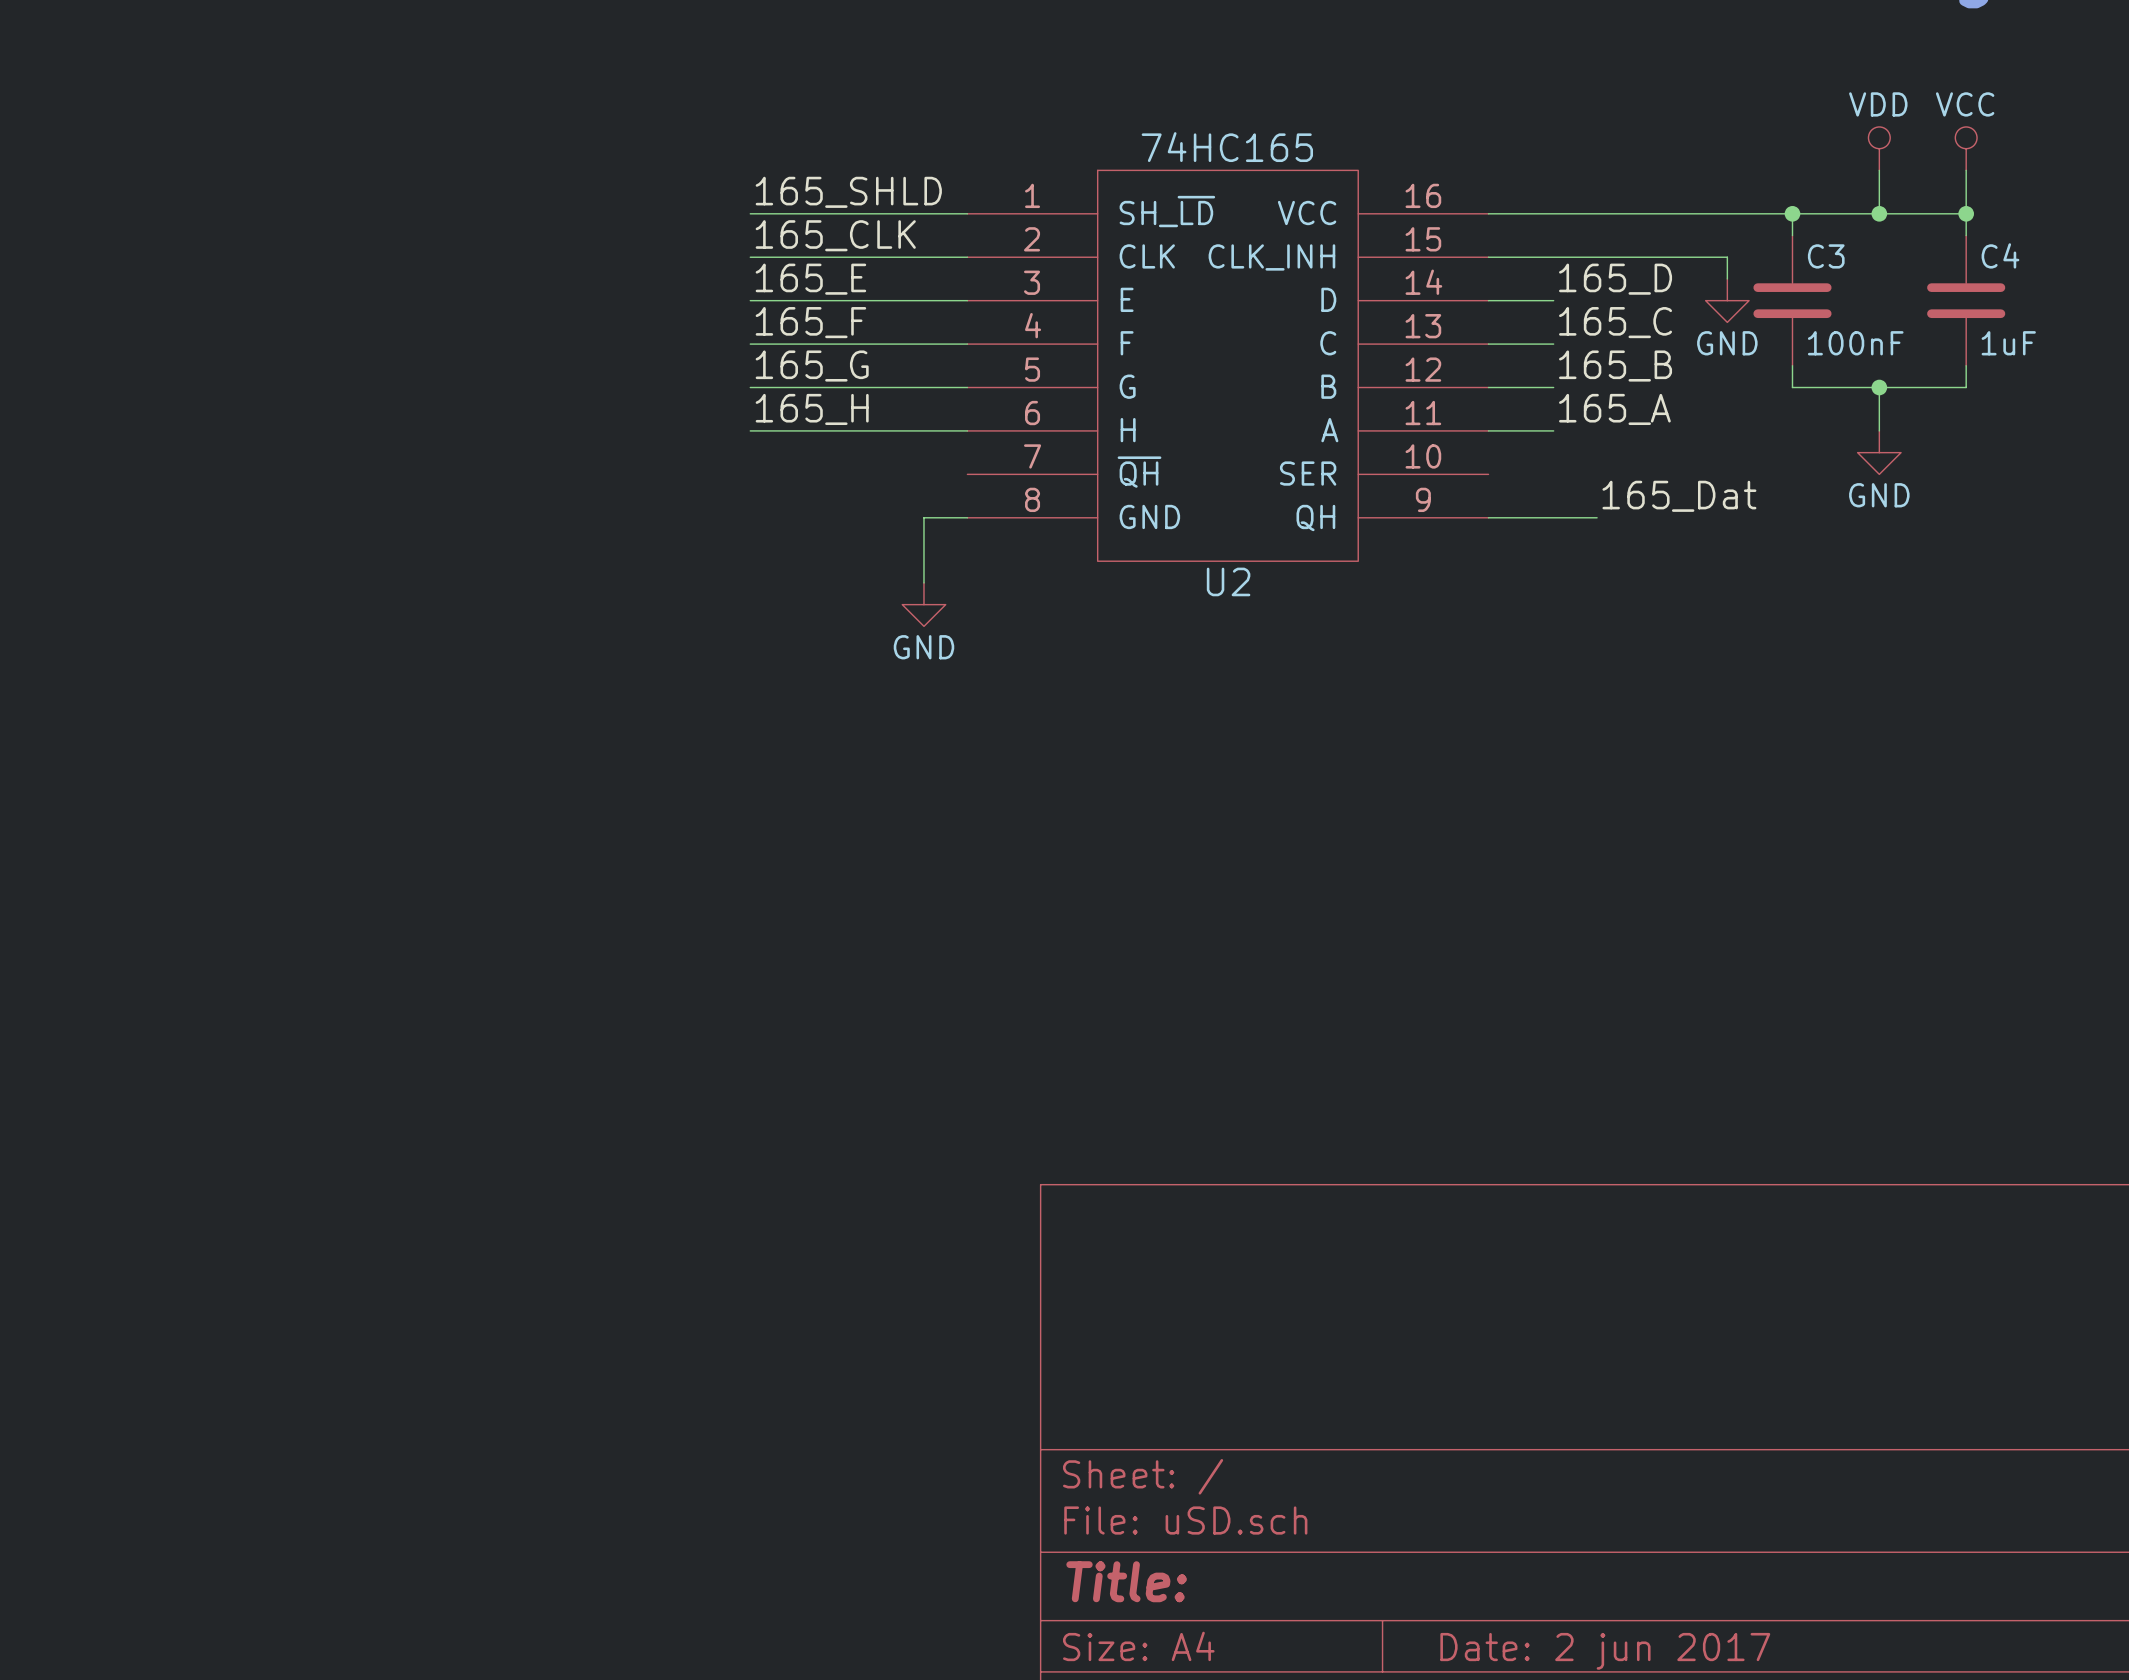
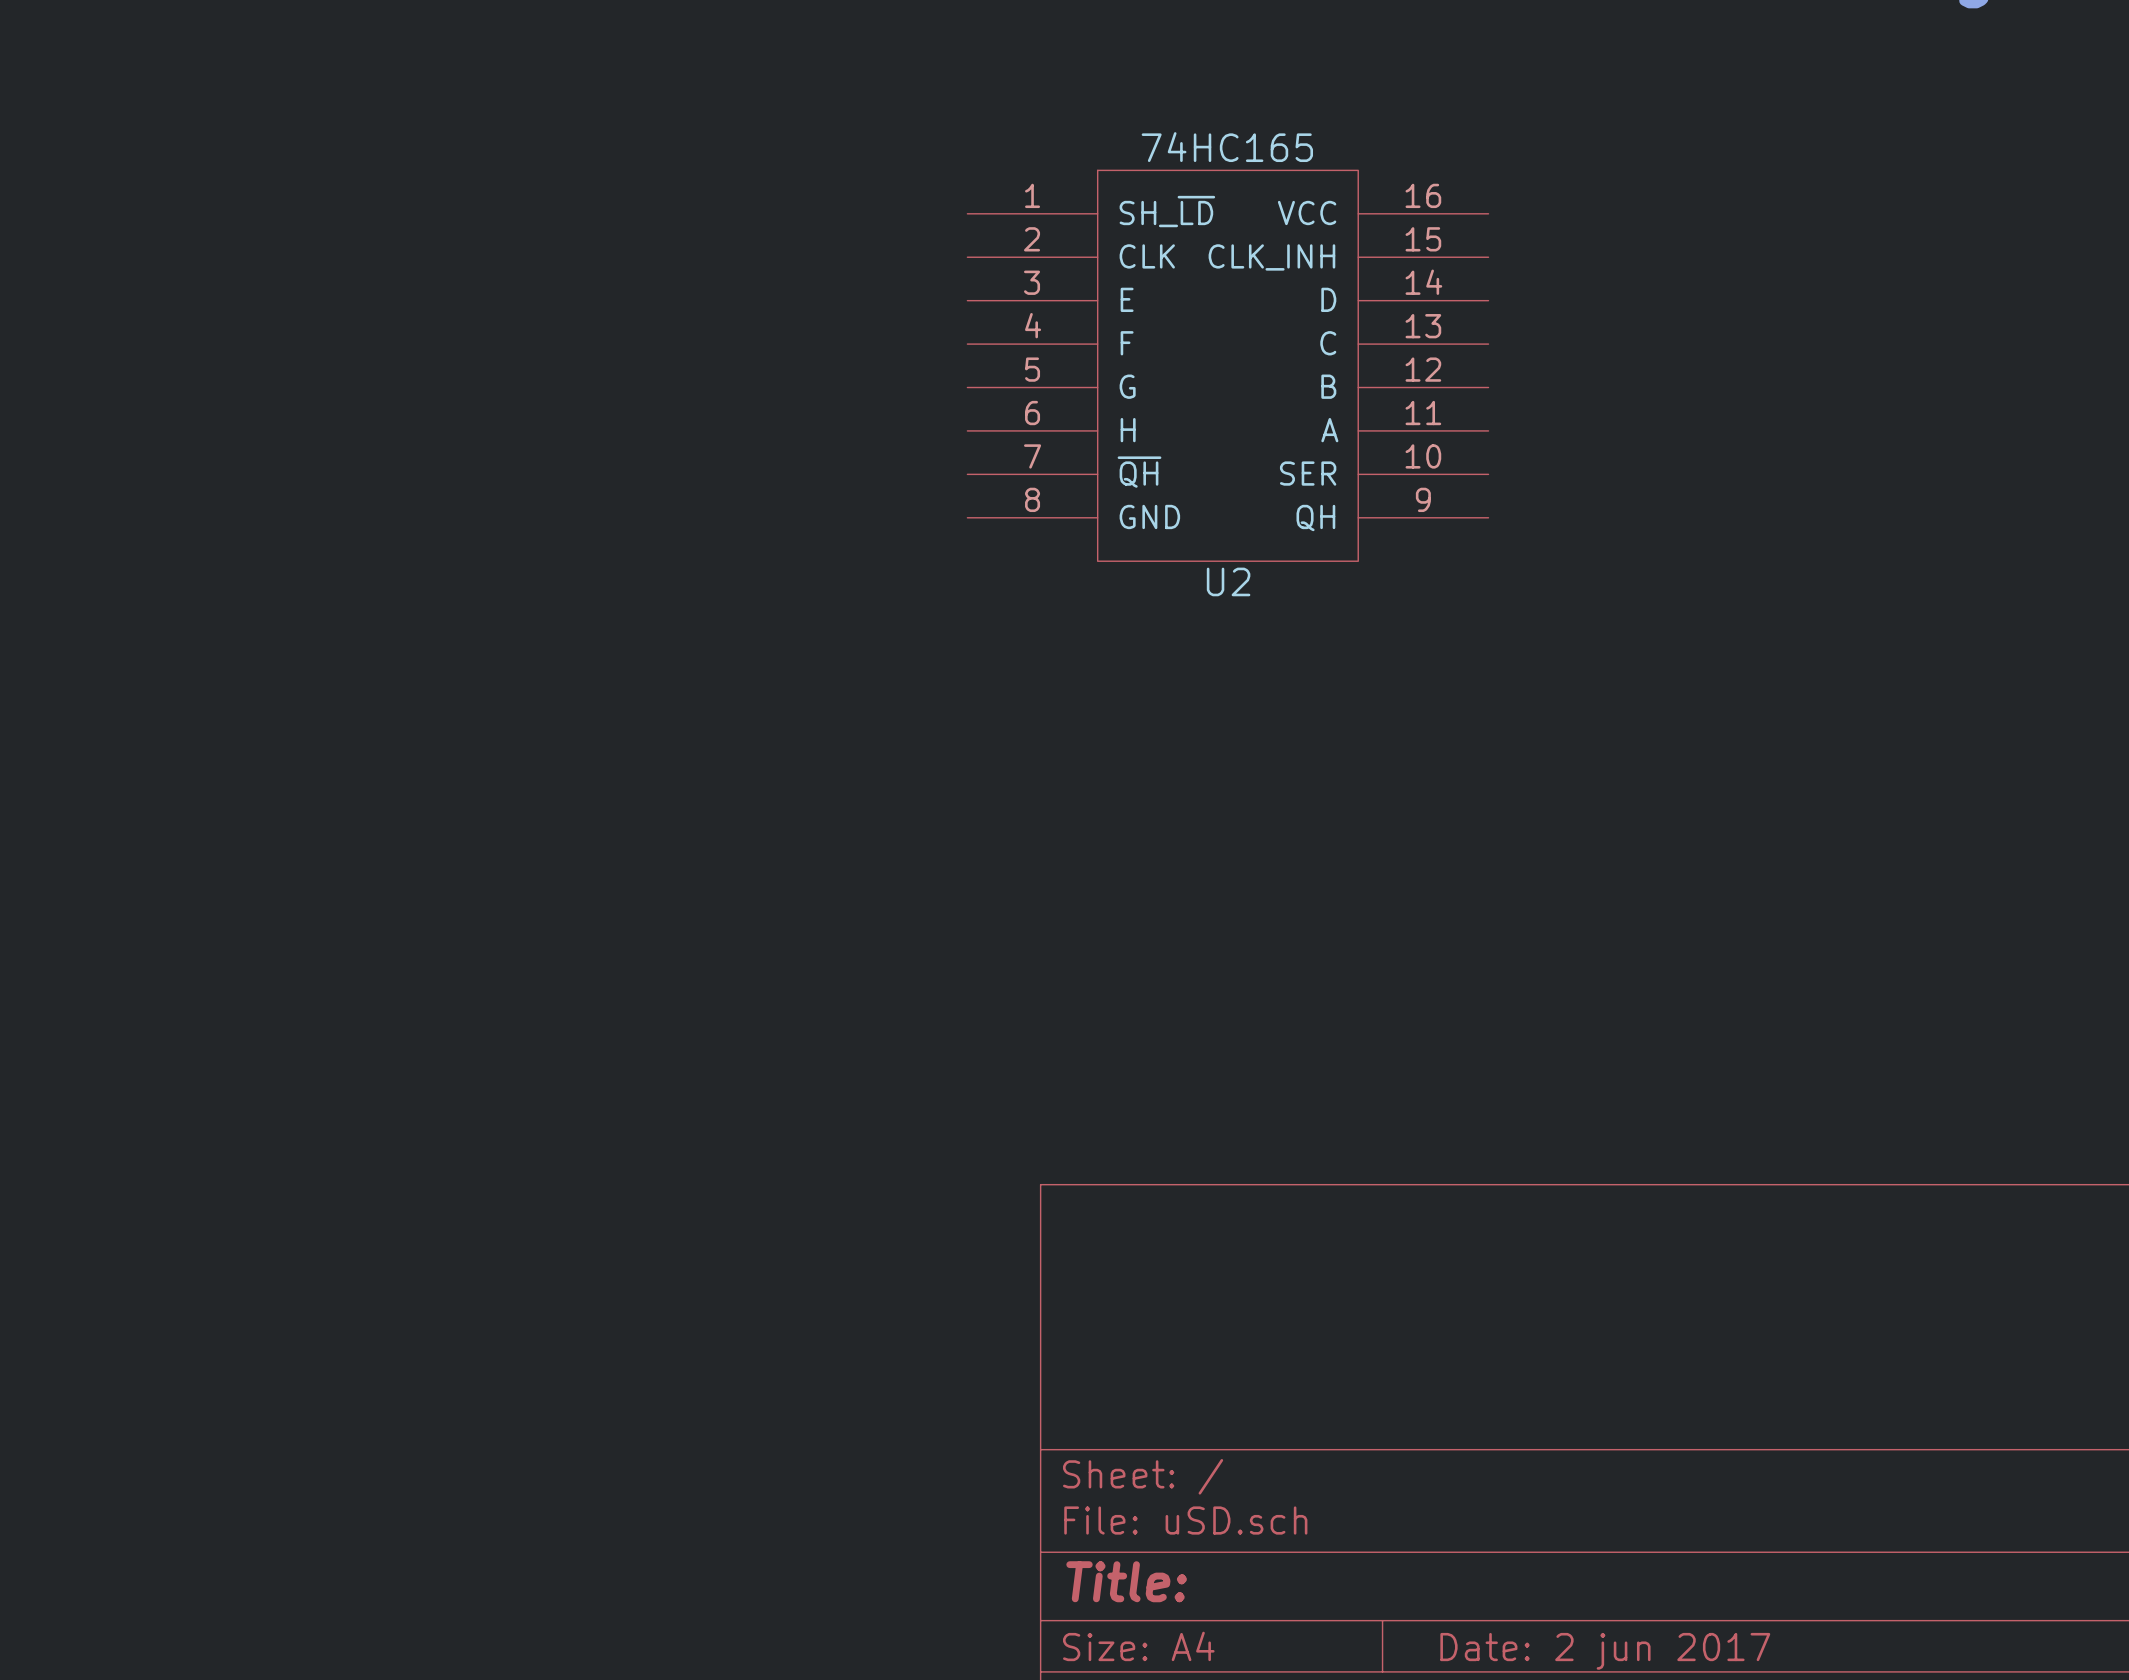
power symbol: VDD (1879, 148) -> none
power symbol: VCC (1966, 148) -> none
wire: (1879, 170) (1879, 213) -> none
wire: (1966, 170) (1966, 235) -> none
label: 165_SHLD (848, 192) -> none
wire: (750, 213) (967, 213) -> none
wire: (1488, 213) (1966, 213) -> none
wire: (1792, 213) (1792, 235) -> none
junction: (1792, 213) -> none
junction: (1879, 213) -> none
junction: (1966, 213) -> none
label: 165_CLK (835, 235) -> none
wire: (750, 257) (967, 257) -> none
wire: (1488, 257) (1727, 257) (1727, 278) -> none
label: 165_E (810, 279) -> none
label: 165_D (1615, 279) -> none
wire: (750, 300) (967, 300) -> none
wire: (1488, 300) (1553, 300) -> none
power symbol: GND (1727, 300) -> none
C3: 100nF (1792, 300) -> none
C4: 1uF (1966, 300) -> none
label: 165_F (810, 322) -> none
label: 165_C (1615, 322) -> none
wire: (750, 344) (967, 344) -> none
wire: (1488, 344) (1553, 344) -> none
wire: (1792, 365) (1792, 387) (1966, 387) (1966, 365) -> none
label: 165_G (812, 366) -> none
label: 165_B (1615, 366) -> none
wire: (750, 387) (967, 387) -> none
wire: (1488, 387) (1553, 387) -> none
wire: (1879, 387) (1879, 430) -> none
junction: (1879, 387) -> none
label: 165_H (812, 409) -> none
label: 165_A (1614, 409) -> none
wire: (750, 430) (967, 430) -> none
wire: (1488, 430) (1553, 430) -> none
power symbol: GND (1879, 452) -> none
label: 165_Dat (1679, 496) -> none
wire: (967, 517) (923, 517) (923, 582) -> none
wire: (1488, 517) (1597, 517) -> none
power symbol: GND (923, 604) -> none

